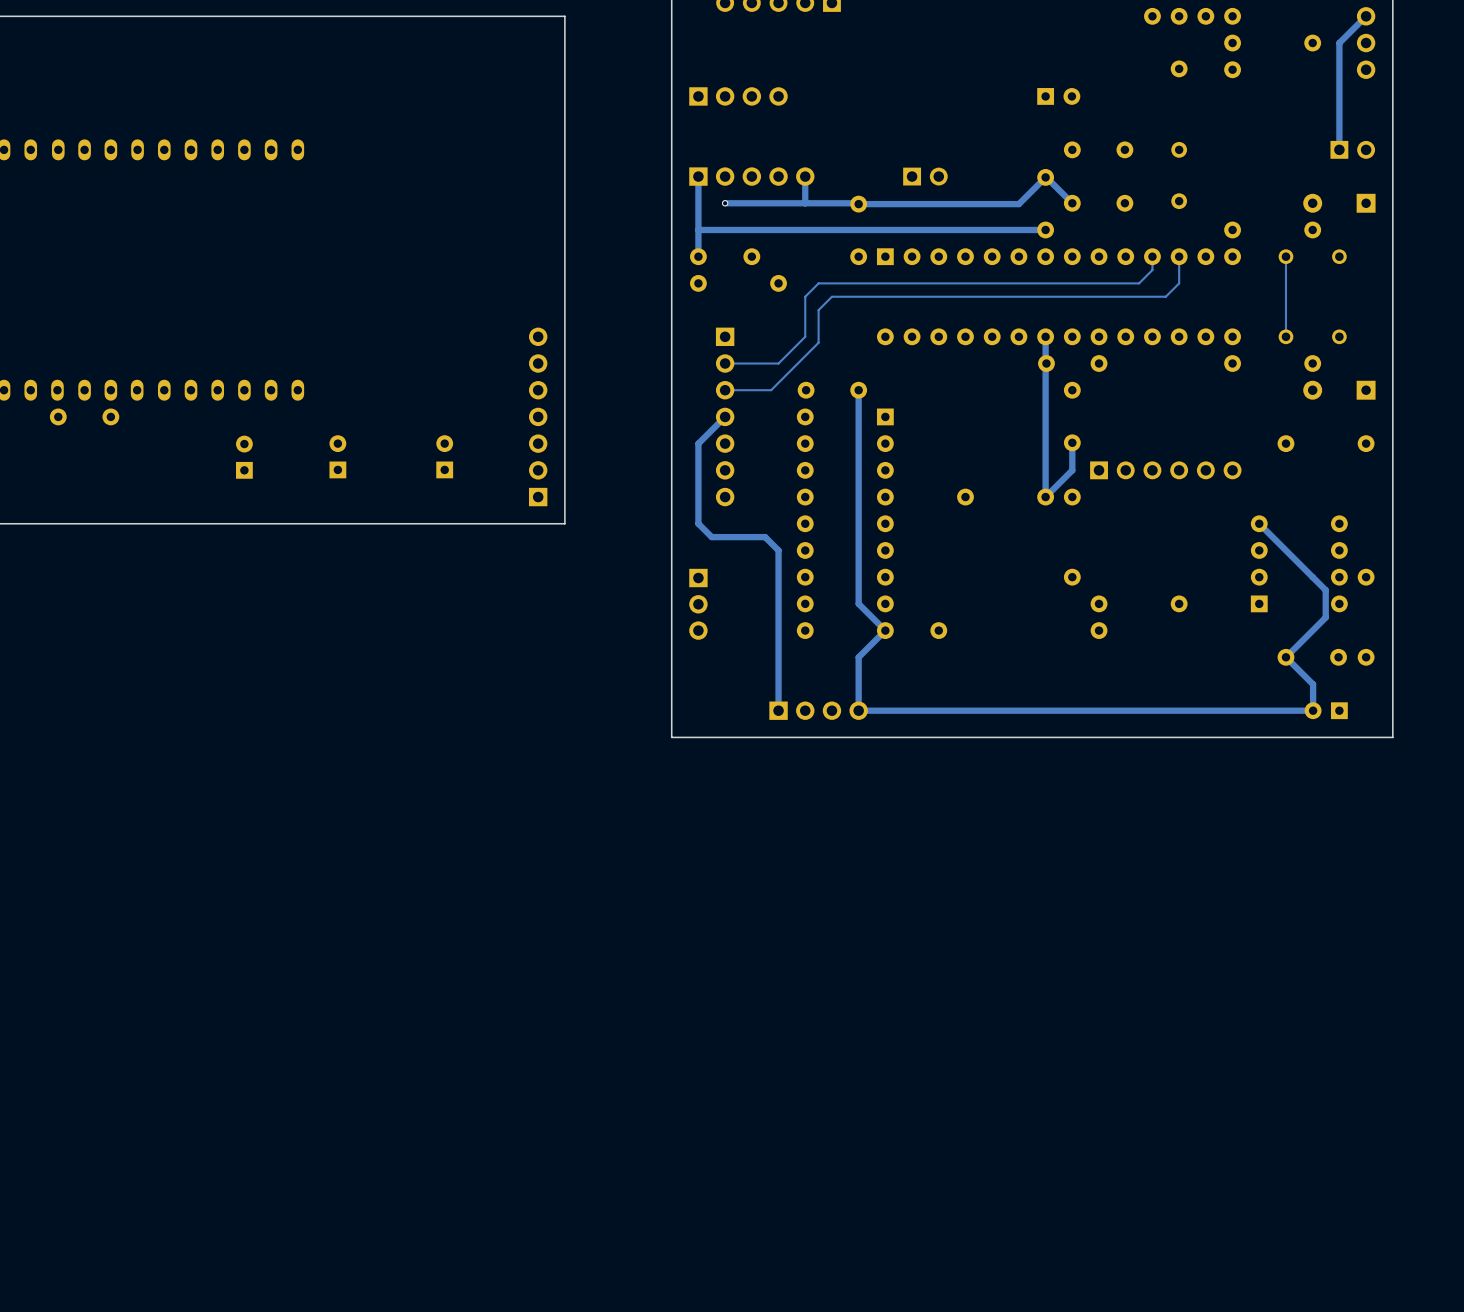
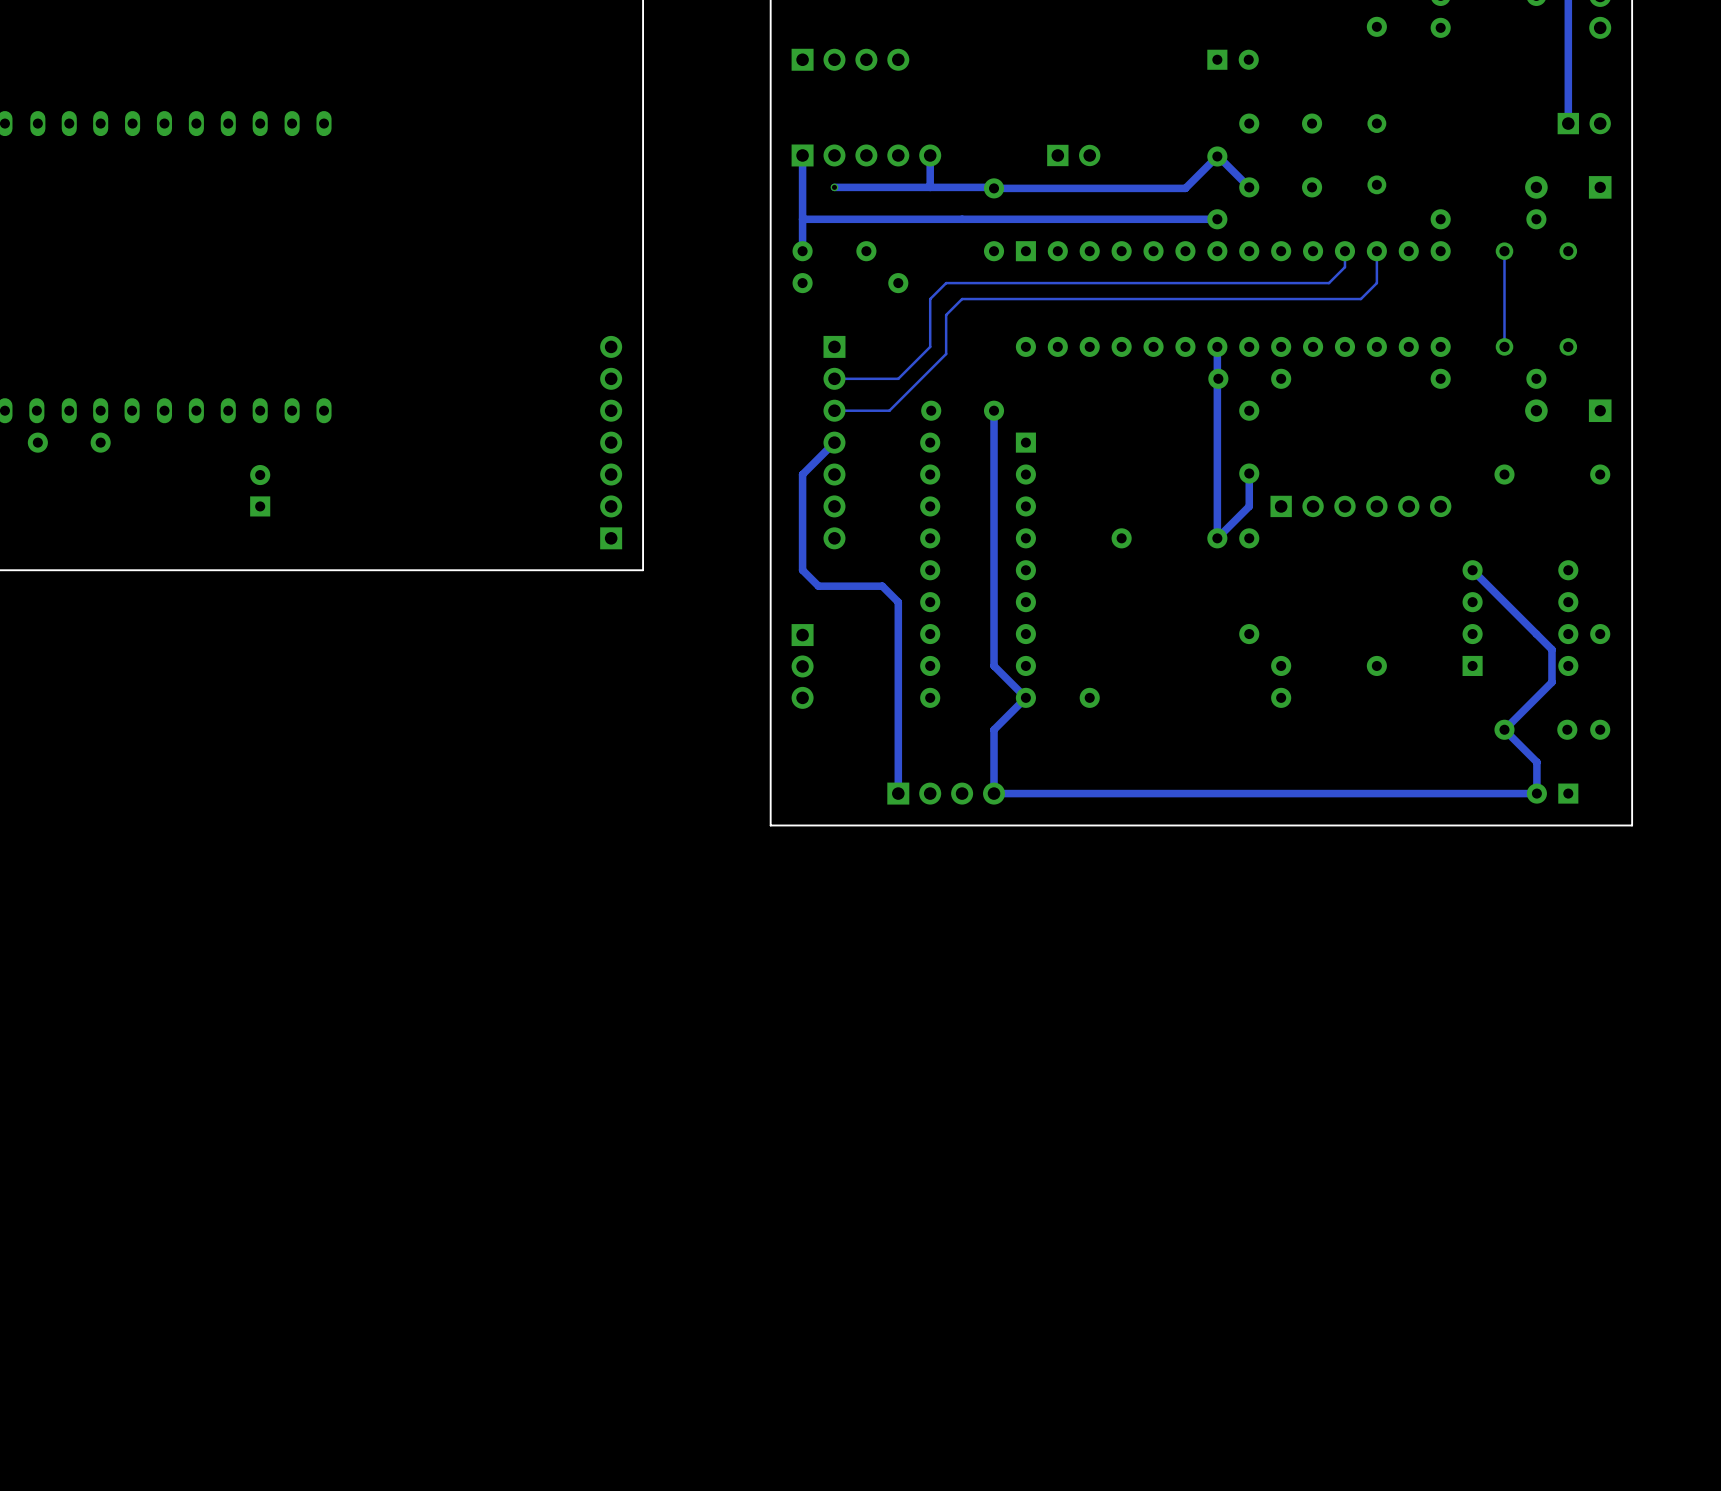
part: (337, 456) -> none
part: (444, 456) -> none

